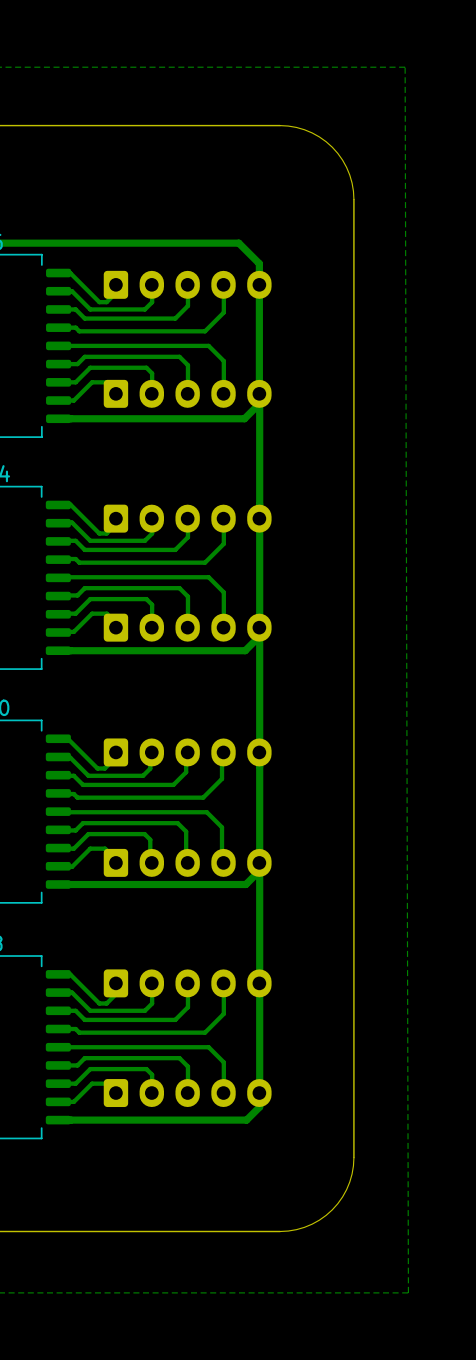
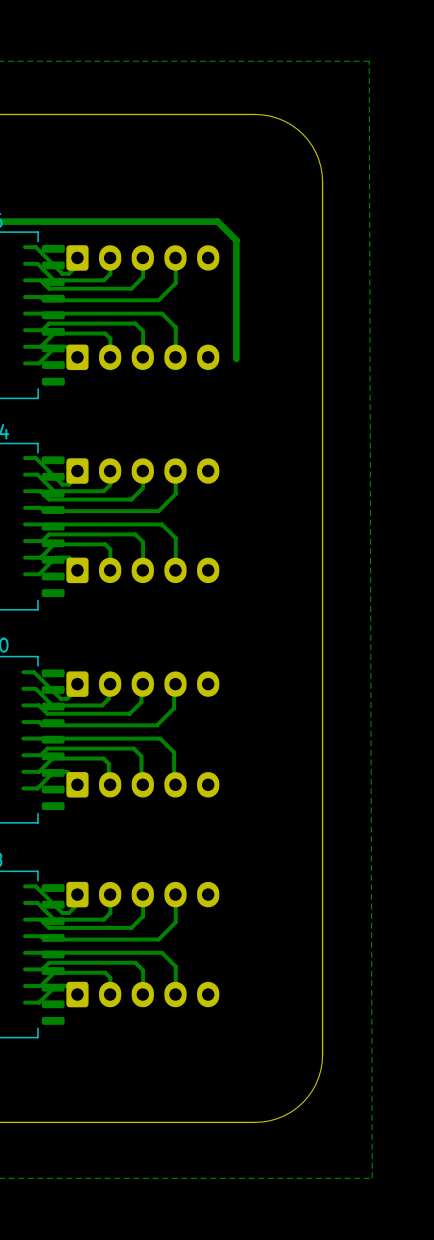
bottom track: (58, 273) (70, 273) (99, 302) (106, 302) (116, 292) (116, 287) -> (24, 247) (35, 247) (62, 273) (69, 273) (77, 265) (77, 260)
part position: (187, 284) -> (142, 257)
bottom track: (152, 287) (152, 302) (144, 309) (90, 309) (72, 291) (58, 291) -> (110, 260) (110, 273) (103, 280) (54, 280) (37, 263) (24, 263)
bottom track: (187, 287) (187, 305) (175, 318) (84, 318) (75, 309) (58, 309) -> (143, 260) (143, 277) (131, 288) (49, 288) (40, 280) (24, 280)
bottom track: (223, 287) (223, 312) (205, 331) (79, 331) (75, 327) (58, 327) -> (175, 260) (175, 283) (158, 300) (44, 300) (40, 296) (24, 296)
bottom track: (58, 345) (208, 345) (223, 361) (223, 391) -> (24, 313) (161, 313) (175, 327) (175, 355)
bottom track: (58, 364) (77, 364) (84, 356) (179, 356) (187, 365) (187, 391) -> (24, 330) (42, 330) (49, 323) (135, 323) (143, 331) (143, 355)
bottom track: (58, 382) (75, 382) (90, 367) (146, 367) (152, 373) (152, 391) -> (24, 346) (40, 346) (54, 333) (105, 333) (110, 338) (110, 355)
bottom track: (259, 389) (259, 1107) (246, 1120) (58, 1120) -> none
bottom track: (116, 391) (106, 382) (92, 382) (73, 400) (58, 400) -> (77, 355) (69, 346) (55, 346) (39, 363) (24, 363)
part position: (187, 393) -> (142, 357)
bottom track: (259, 403) (244, 418) (58, 418) -> none
bottom track: (58, 504) (70, 504) (99, 533) (106, 533) (116, 523) (116, 518) -> (24, 458) (35, 458) (62, 484) (69, 484) (77, 475) (77, 471)
bottom track: (152, 518) (152, 533) (144, 540) (90, 540) (72, 522) (58, 522) -> (110, 471) (110, 484) (103, 491) (54, 491) (37, 474) (24, 474)
bottom track: (187, 518) (187, 537) (175, 549) (84, 549) (75, 540) (58, 540) -> (143, 471) (143, 487) (131, 499) (49, 499) (40, 491) (24, 491)
part position: (187, 518) -> (142, 471)
bottom track: (223, 518) (223, 543) (205, 562) (79, 562) (75, 559) (58, 559) -> (175, 471) (175, 494) (158, 511) (44, 511) (40, 507) (24, 507)
bottom track: (58, 577) (208, 577) (223, 592) (223, 623) -> (24, 524) (161, 524) (175, 538) (175, 566)
bottom track: (58, 595) (77, 595) (84, 588) (179, 588) (187, 596) (187, 623) -> (24, 541) (42, 541) (49, 534) (135, 534) (143, 542) (143, 566)
bottom track: (58, 613) (75, 613) (90, 599) (146, 599) (152, 604) (152, 623) -> (24, 557) (40, 557) (54, 544) (105, 544) (110, 549) (110, 566)
bottom track: (116, 623) (106, 613) (92, 613) (73, 631) (58, 631) -> (77, 566) (69, 557) (55, 557) (39, 574) (24, 574)
part position: (187, 627) -> (142, 570)
bottom track: (259, 636) (245, 650) (58, 650) -> none
bottom track: (56, 739) (68, 739) (97, 768) (104, 768) (114, 758) (114, 753) -> (23, 672) (34, 672) (60, 698) (67, 698) (76, 690) (76, 685)
part position: (187, 752) -> (142, 684)
bottom track: (150, 753) (150, 768) (143, 775) (88, 775) (70, 757) (56, 757) -> (108, 685) (108, 698) (102, 705) (52, 705) (35, 688) (23, 688)
bottom track: (186, 753) (186, 772) (173, 784) (82, 784) (73, 775) (56, 775) -> (141, 685) (141, 702) (129, 713) (47, 713) (39, 705) (23, 705)
bottom track: (222, 753) (222, 778) (203, 797) (77, 797) (73, 794) (56, 794) -> (174, 685) (174, 708) (156, 725) (42, 725) (39, 722) (23, 722)
bottom track: (56, 812) (206, 812) (222, 827) (222, 858) -> (23, 738) (160, 738) (174, 752) (174, 780)
bottom track: (56, 830) (75, 830) (82, 823) (177, 823) (186, 831) (186, 858) -> (23, 755) (40, 755) (47, 748) (133, 748) (141, 756) (141, 780)
bottom track: (56, 848) (73, 848) (88, 834) (144, 834) (150, 839) (150, 858) -> (23, 771) (39, 771) (52, 758) (103, 758) (108, 763) (108, 780)
bottom track: (114, 858) (105, 848) (90, 848) (72, 866) (56, 866) -> (76, 780) (67, 771) (54, 771) (37, 788) (23, 788)
part position: (187, 862) -> (142, 784)
bottom track: (259, 870) (245, 884) (58, 884) -> none
bottom track: (58, 974) (70, 974) (99, 1003) (106, 1003) (116, 993) (116, 988) -> (24, 886) (35, 886) (62, 912) (69, 912) (77, 904) (77, 899)
part position: (187, 983) -> (142, 894)
bottom track: (152, 988) (152, 1003) (144, 1010) (90, 1010) (72, 992) (58, 992) -> (110, 899) (110, 913) (103, 919) (54, 919) (37, 902) (24, 902)
bottom track: (187, 988) (187, 1007) (175, 1019) (84, 1019) (75, 1010) (58, 1010) -> (143, 899) (143, 916) (131, 927) (49, 927) (40, 919) (24, 919)
bottom track: (223, 988) (223, 1013) (205, 1032) (79, 1032) (75, 1029) (58, 1029) -> (175, 899) (175, 922) (158, 939) (44, 939) (40, 936) (24, 936)
bottom track: (58, 1047) (208, 1047) (223, 1062) (223, 1093) -> (24, 952) (161, 952) (175, 966) (175, 994)
bottom track: (58, 1065) (77, 1065) (84, 1058) (179, 1058) (187, 1066) (187, 1093) -> (24, 969) (42, 969) (49, 962) (135, 962) (143, 970) (143, 994)
bottom track: (58, 1083) (75, 1083) (90, 1069) (146, 1069) (152, 1074) (152, 1093) -> (24, 986) (40, 986) (54, 972) (105, 972) (110, 977) (110, 994)
bottom track: (116, 1093) (106, 1083) (92, 1083) (73, 1101) (58, 1101) -> (77, 994) (69, 986) (55, 986) (39, 1002) (24, 1002)
part position: (187, 1093) -> (142, 994)

